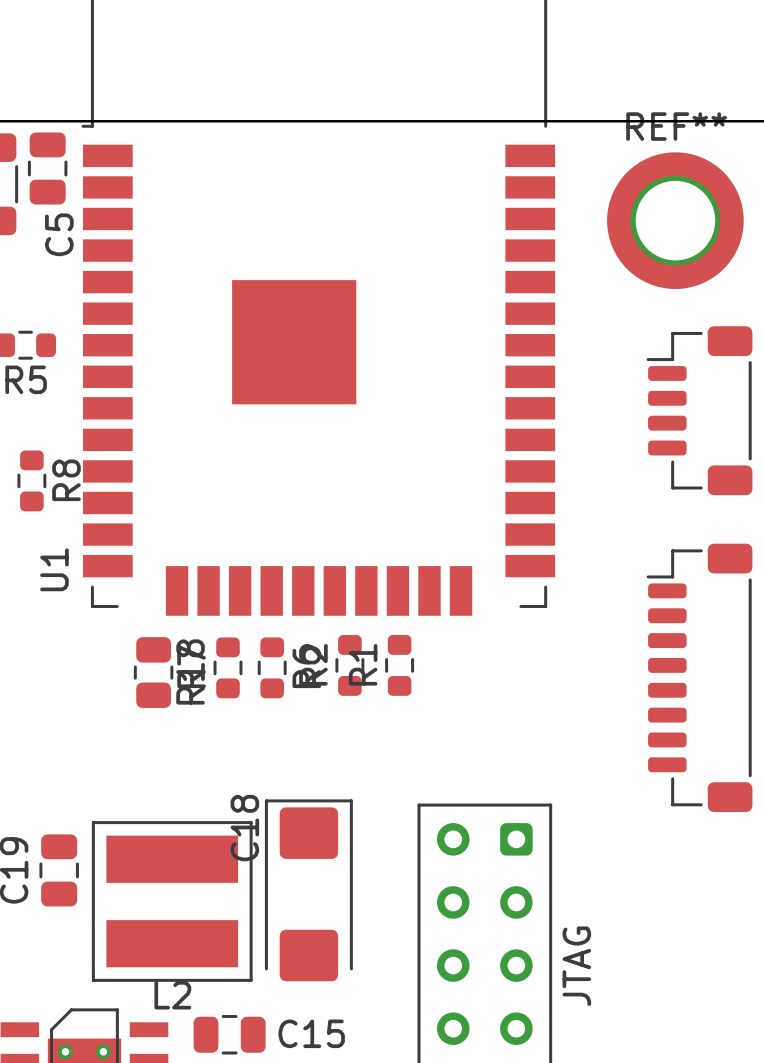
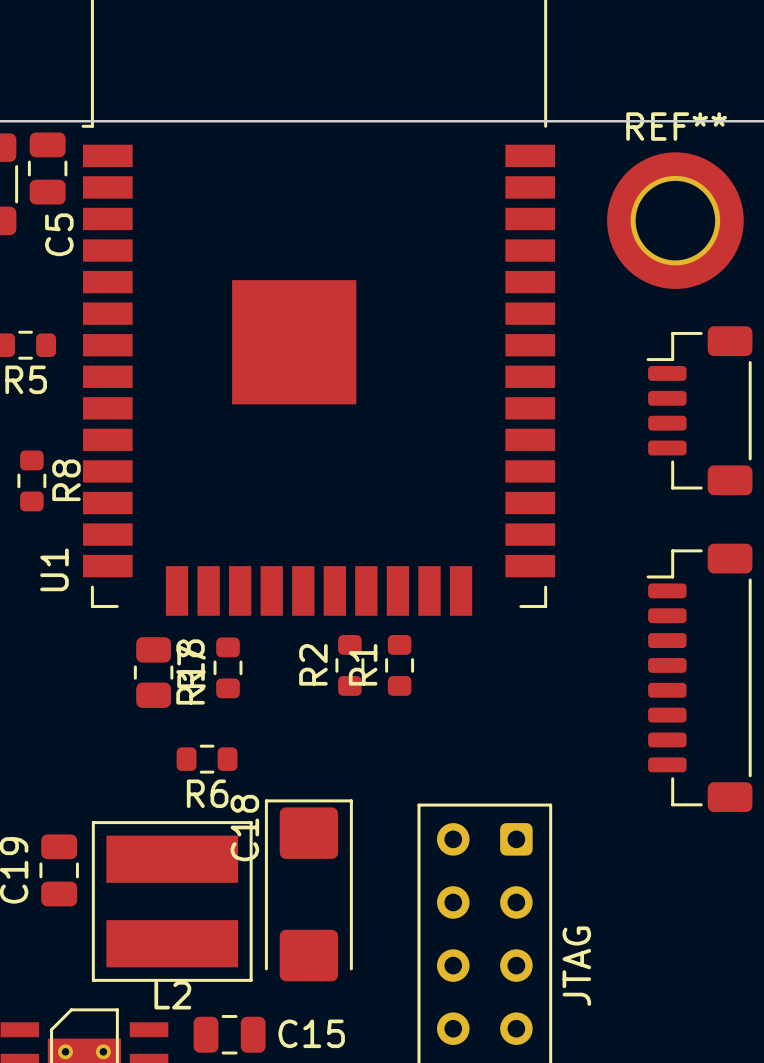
R6 rotation: 0° (272, 667) -> 90° clockwise (207, 759)
R6 position: (272, 667) -> (207, 759)

